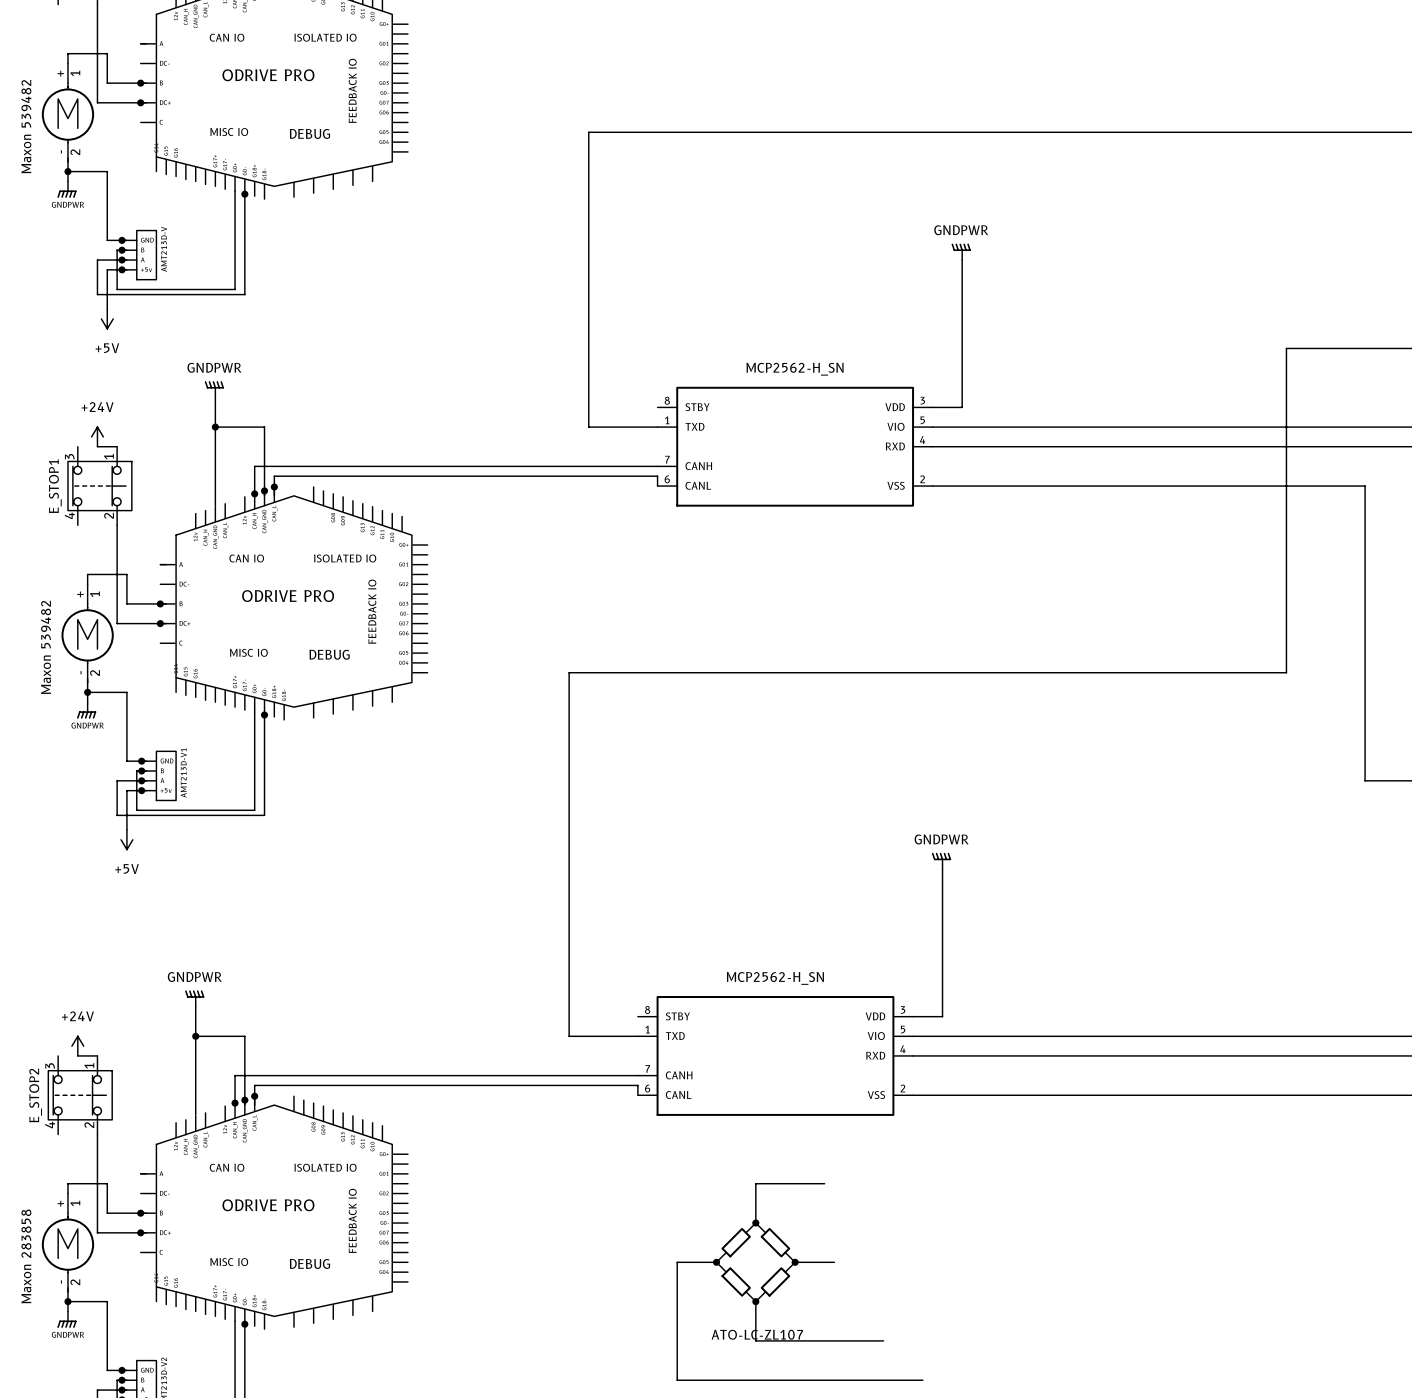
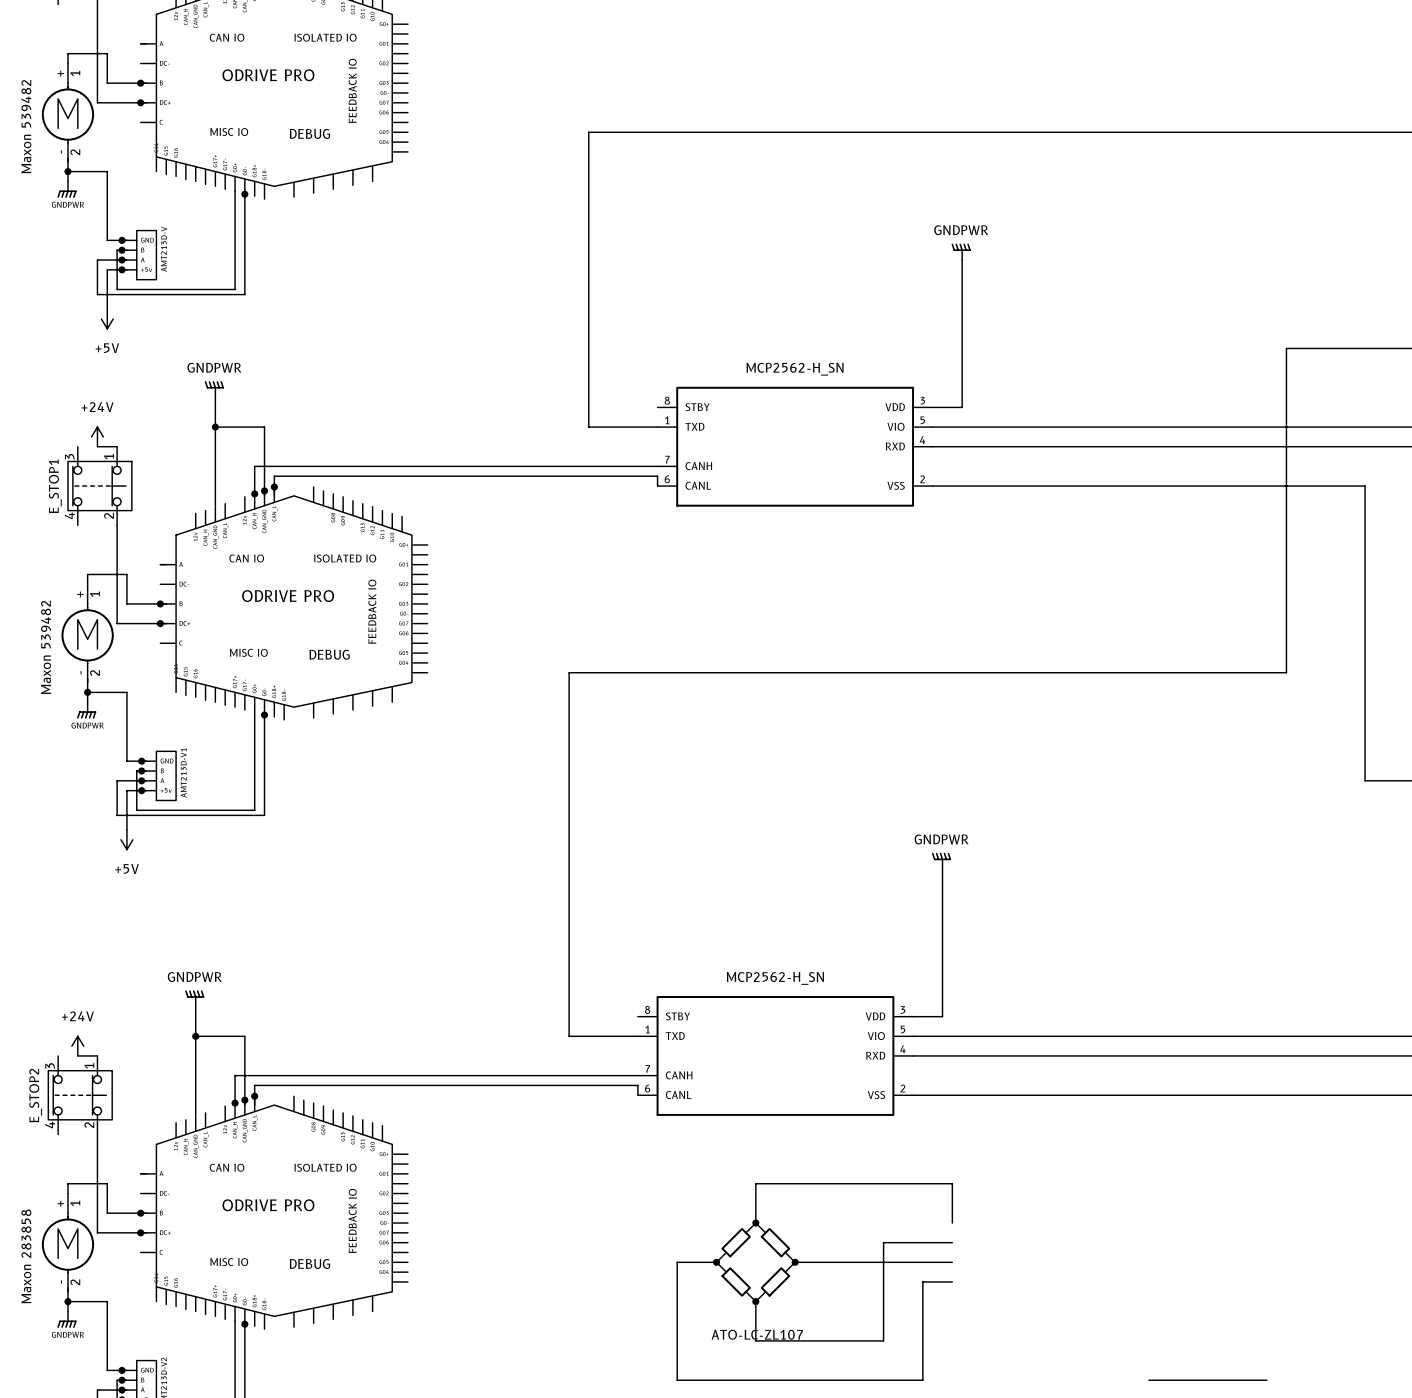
wire: none -> (824, 1183) (952, 1183) (952, 1223)
wire: none -> (952, 1242) (883, 1242) (883, 1340)
wire: none -> (834, 1262) (952, 1262)
wire: none -> (952, 1281) (922, 1281) (922, 1380)
wire: none -> (1148, 1380) (1266, 1380)

